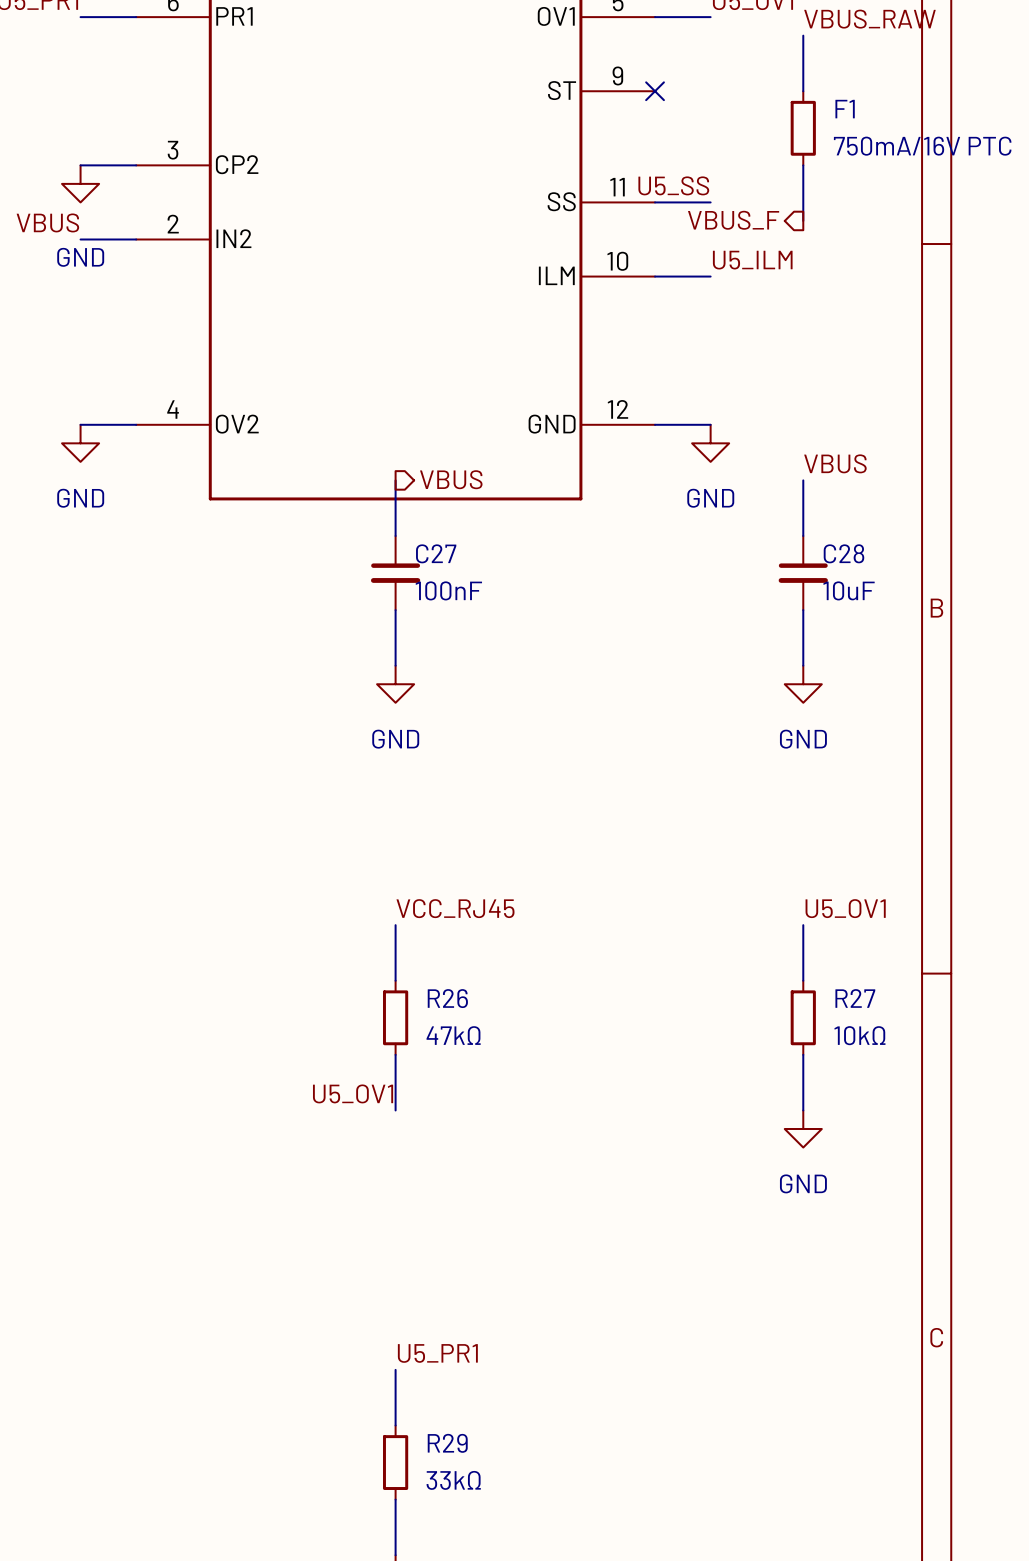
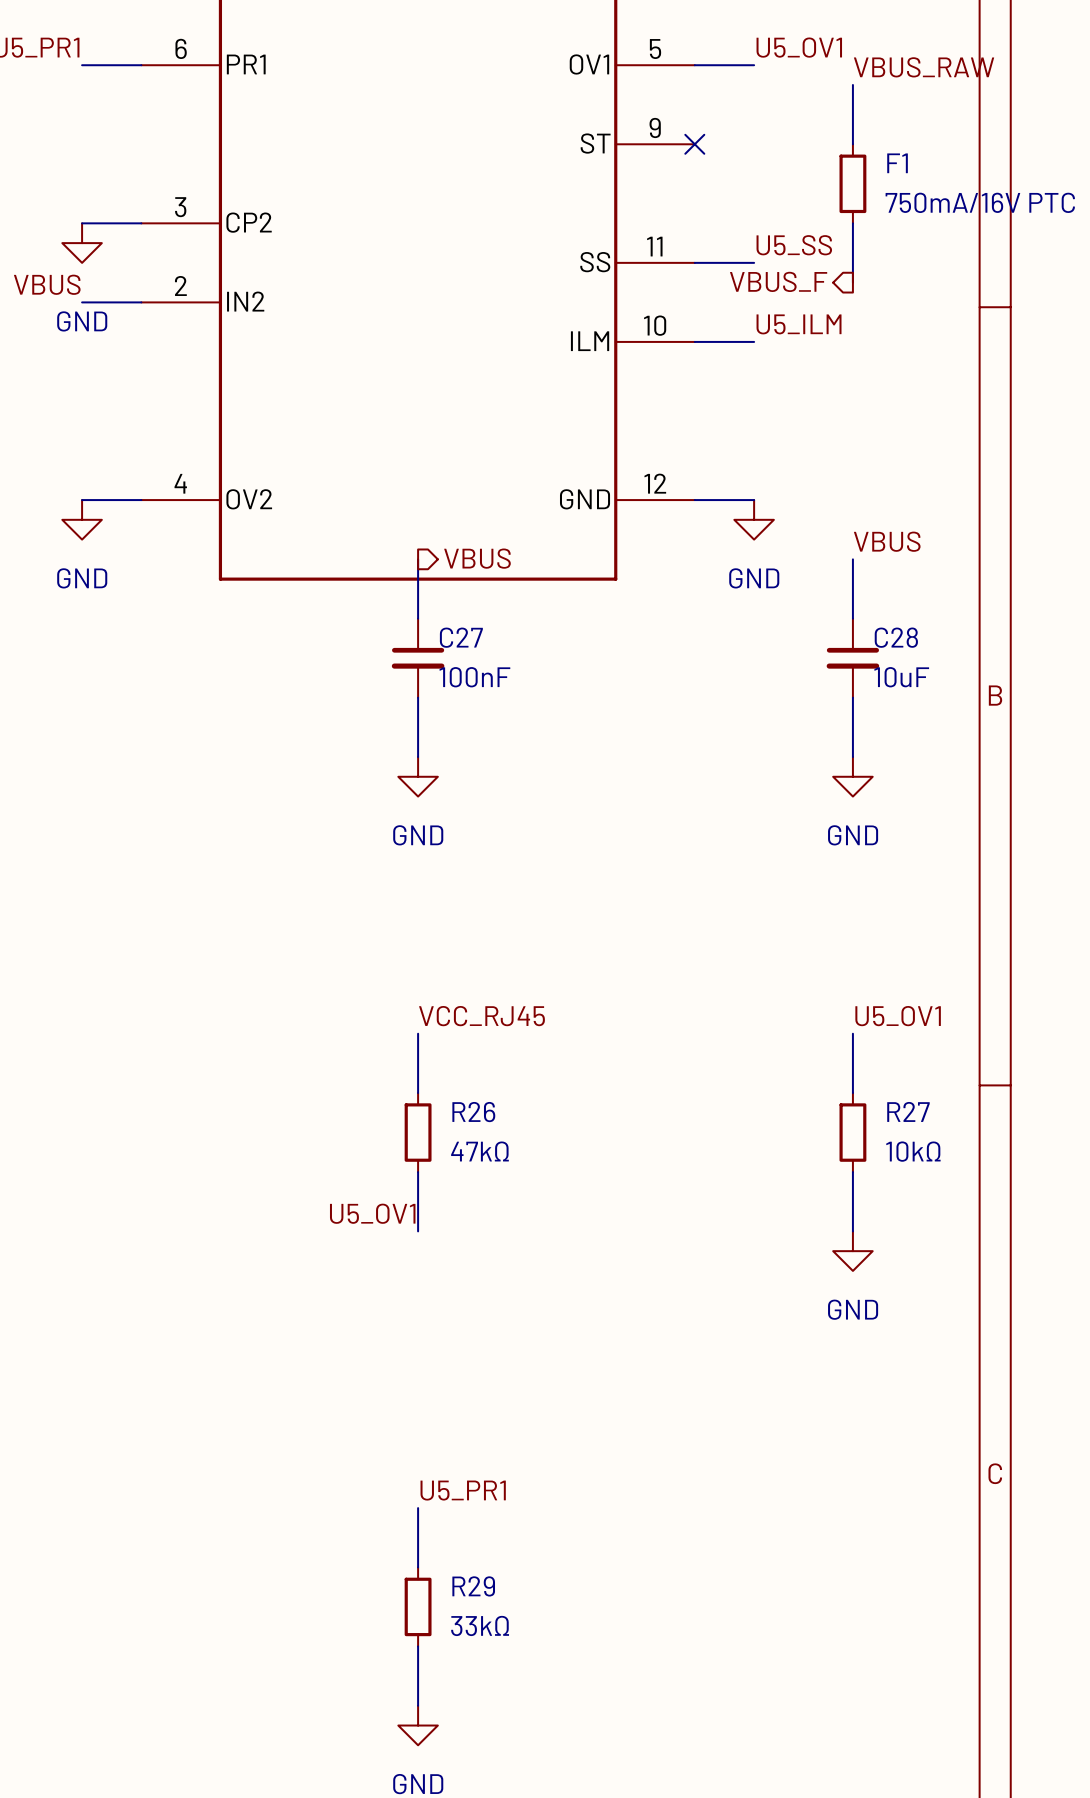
label position: U5_SS (673, 185) -> U5_SS (794, 245)

